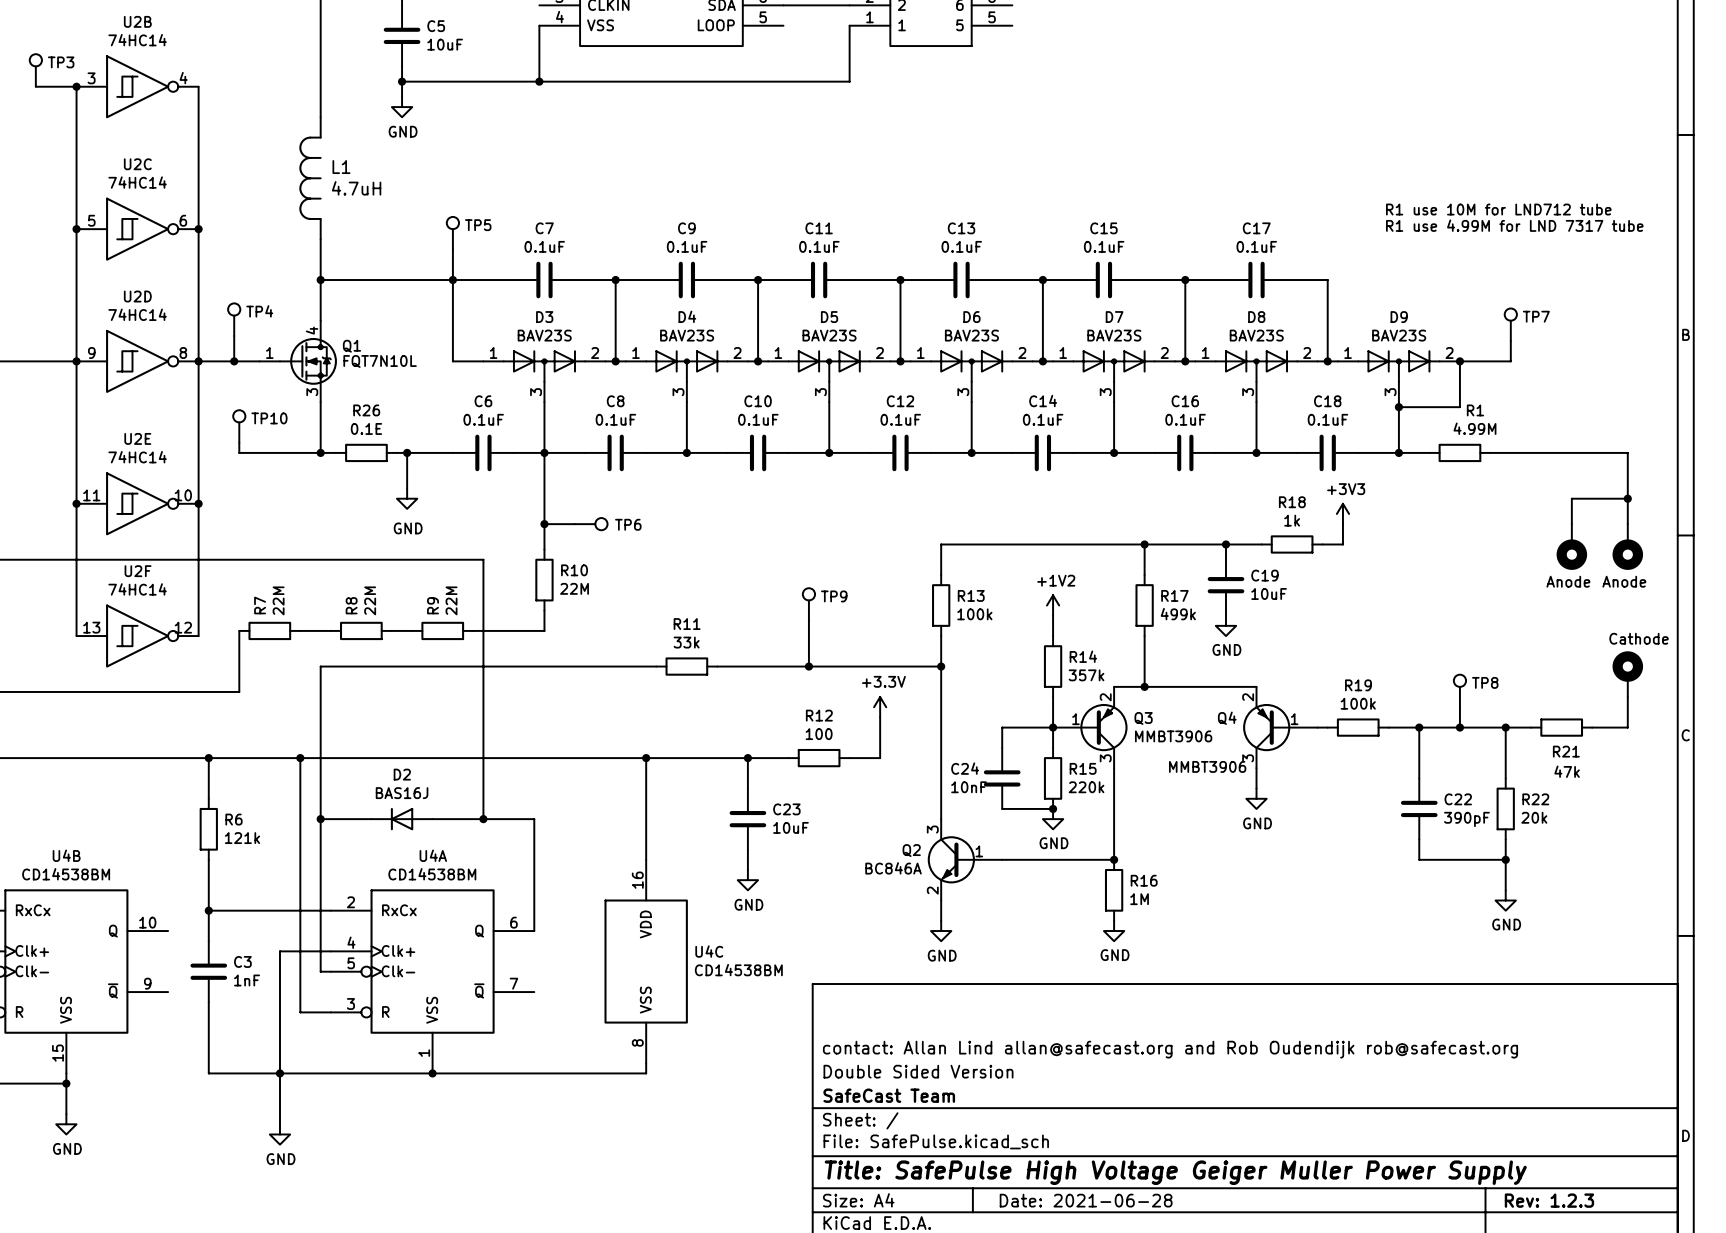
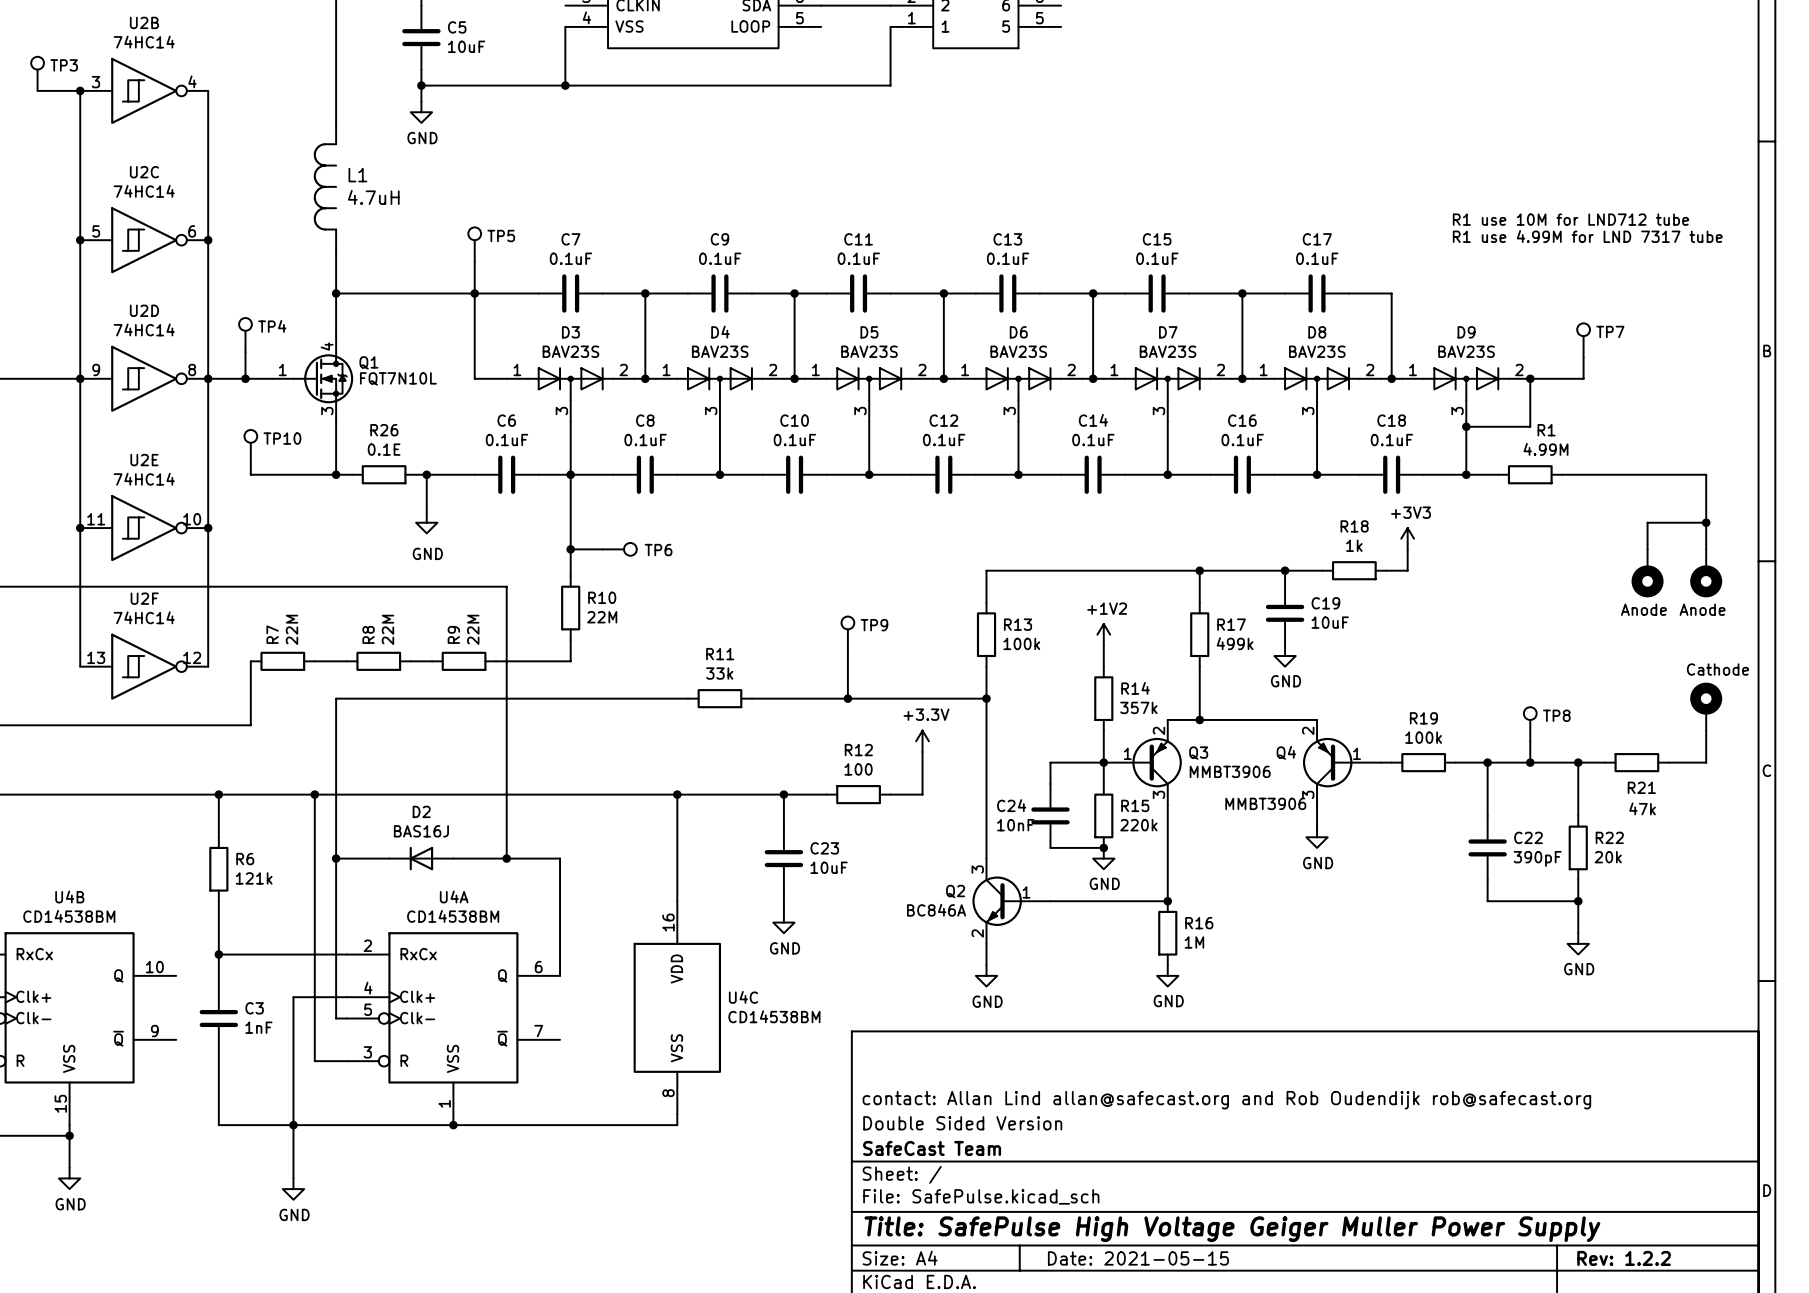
title block: Date: 2021-06-28 (1086, 1200) -> Date: 2021-05-15 (1138, 1258)
title block: Rev: 1.2.3 (1549, 1200) -> Rev: 1.2.2 (1624, 1258)

